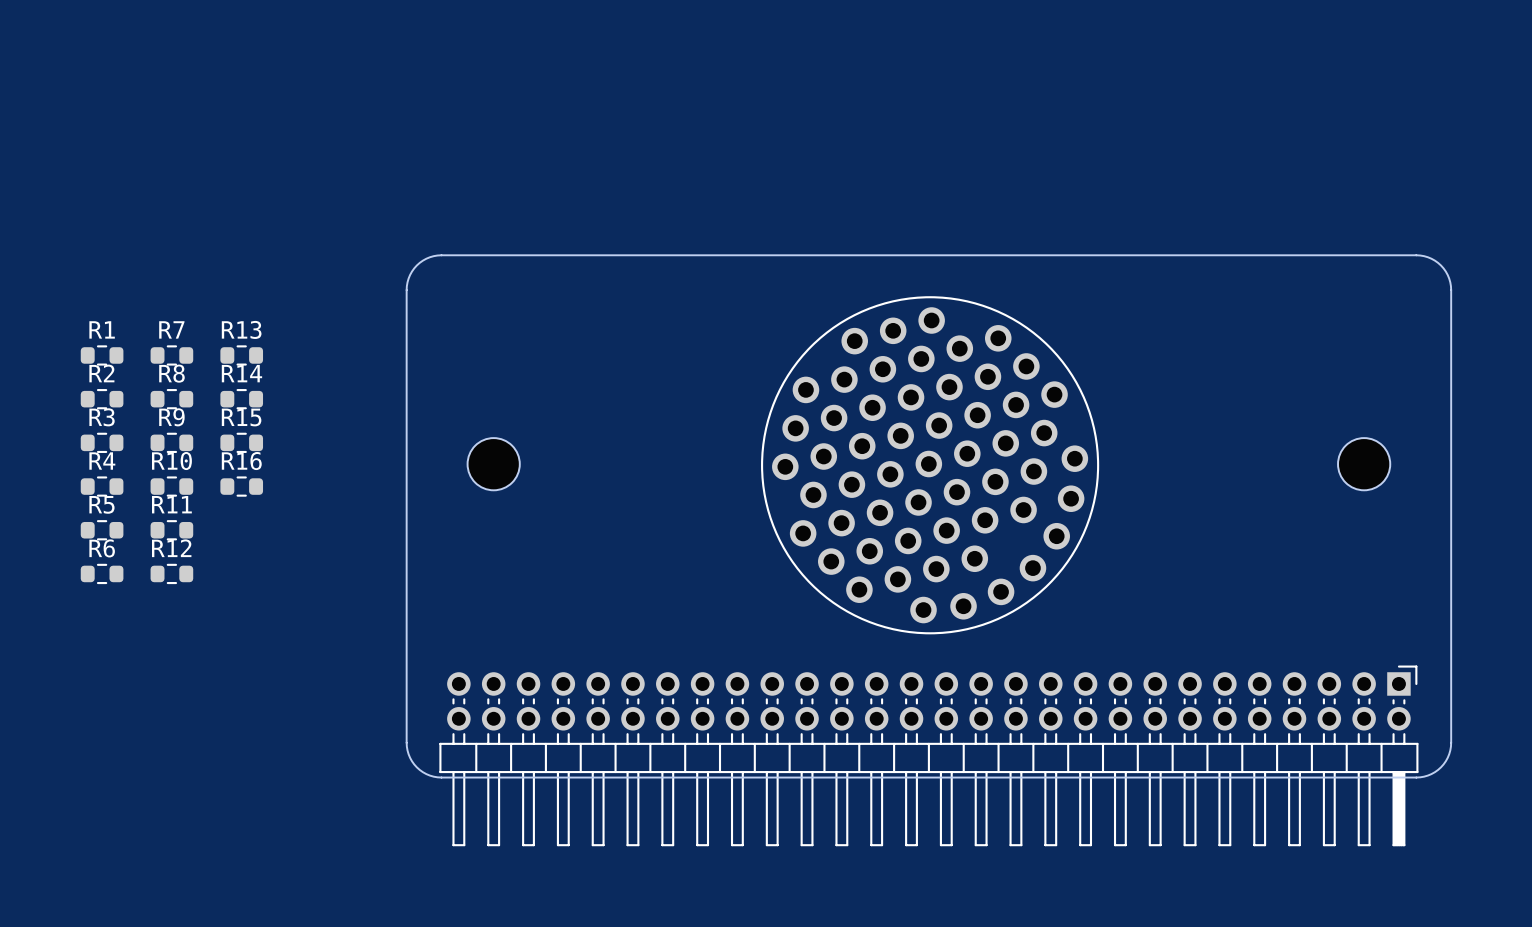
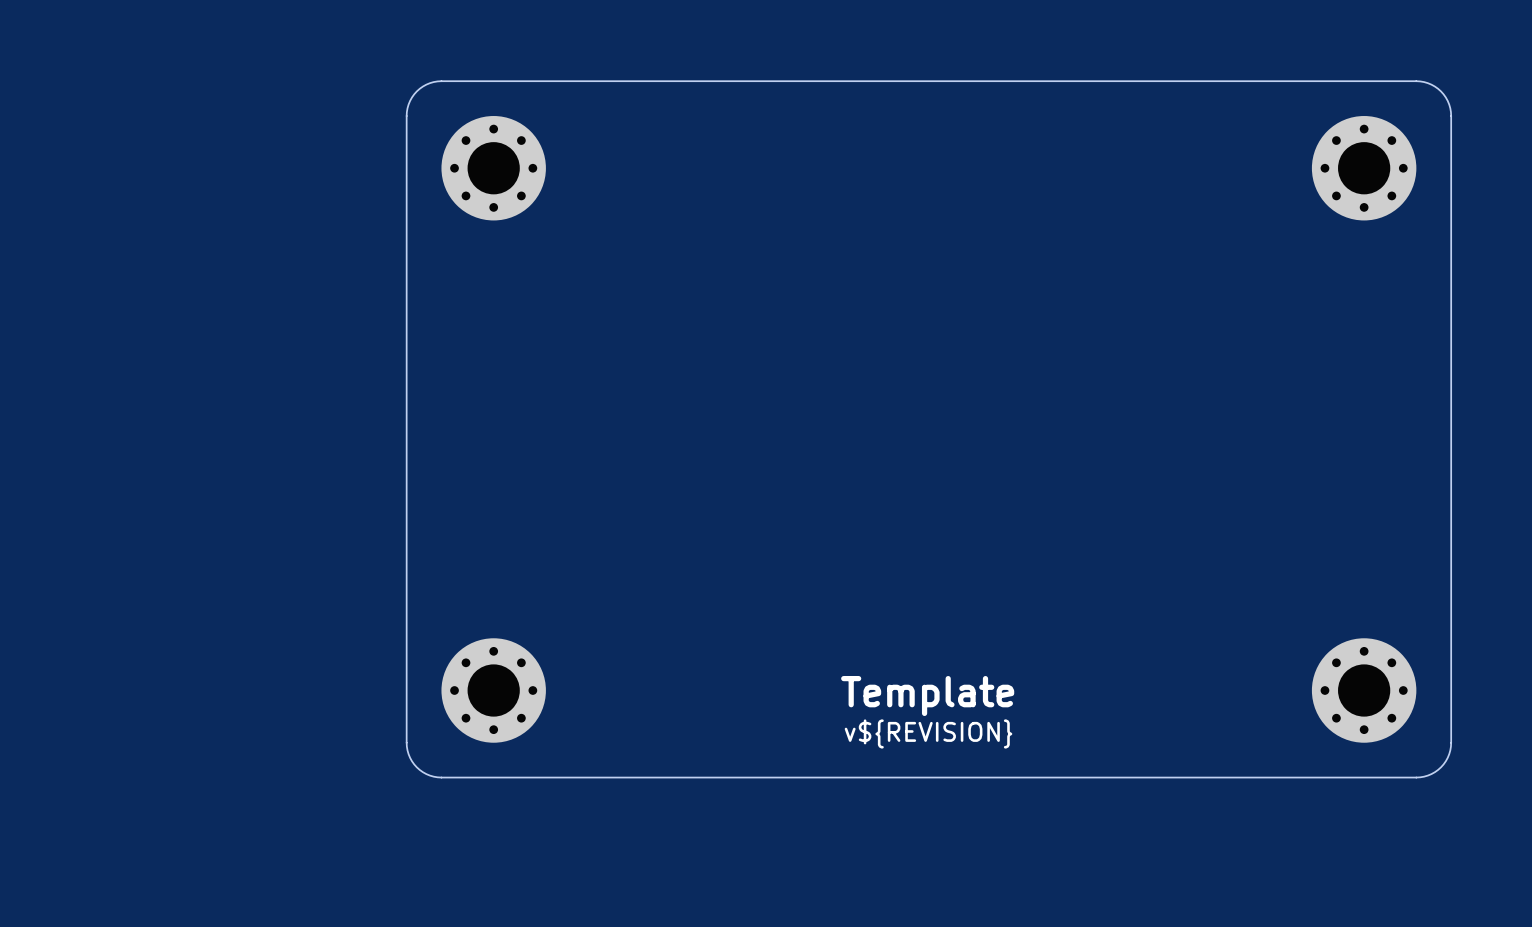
part: none -> (493, 168)
part: none -> (1364, 168)
board edge: (406, 290) (410, 274) (416, 265) (426, 258) (441, 255) (1416, 255) (1427, 257) (1440, 265) (1447, 274) (1451, 290) -> (406, 290) (406, 112) (410, 100) (416, 91) (426, 84) (441, 81) (1424, 82) (1434, 86) (1443, 94) (1450, 112) (1451, 290)
R1: (102, 355) -> none
R7: (171, 355) -> none
R13: (241, 355) -> none
R2: (102, 399) -> none
R8: (171, 399) -> none
R14: (241, 399) -> none
R3: (102, 442) -> none
R9: (171, 442) -> none
R15: (241, 442) -> none
part: (493, 464) -> none
part: (1364, 464) -> none
part: (930, 465) -> none
R4: (102, 486) -> none
R10: (171, 486) -> none
R16: (241, 486) -> none
R5: (102, 530) -> none
R11: (171, 530) -> none
R6: (102, 573) -> none
R12: (171, 573) -> none
part: none -> (493, 690)
part: none -> (1364, 690)
text: none -> Template (927, 696)
text: none -> v${REVISION} (928, 733)
part: (928, 755) -> none

